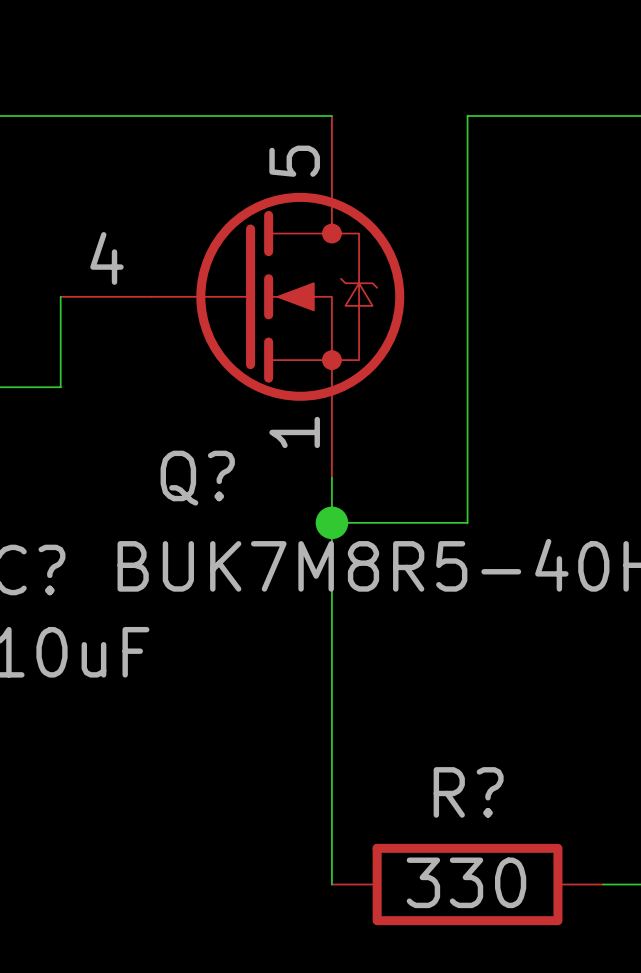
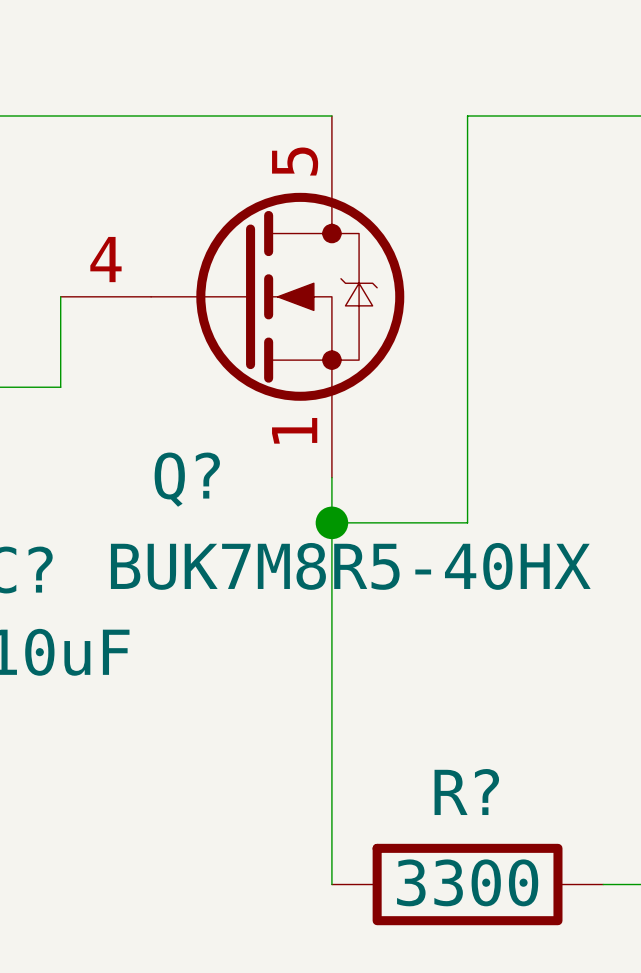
R? value: 330 (466, 882) -> 3300 (467, 882)

